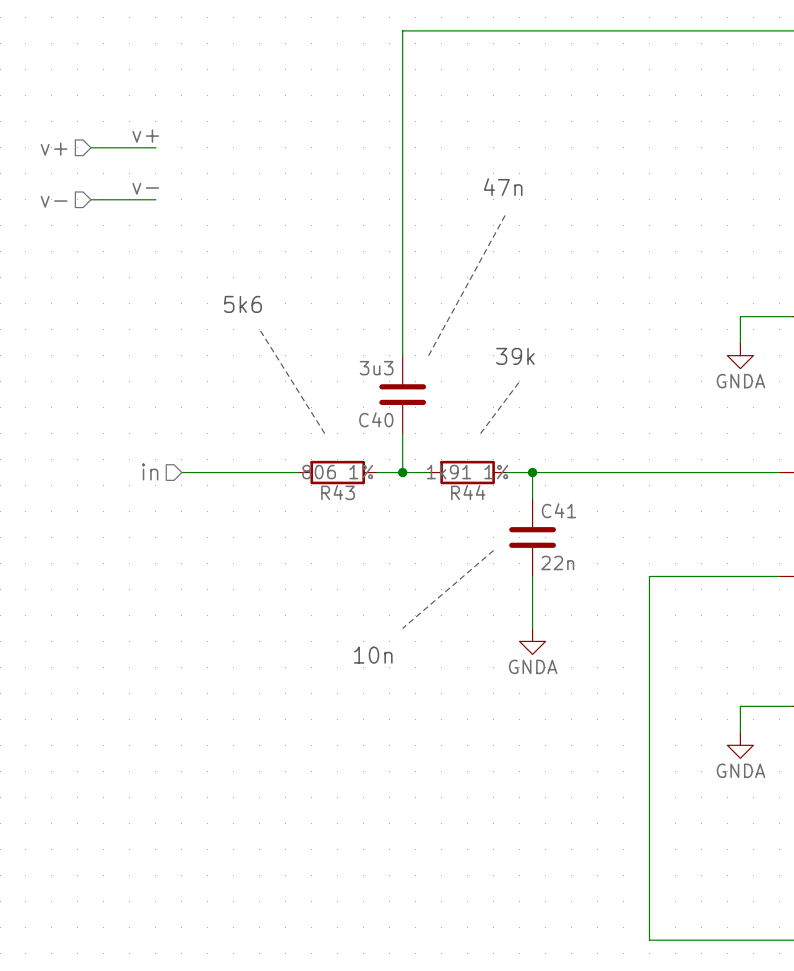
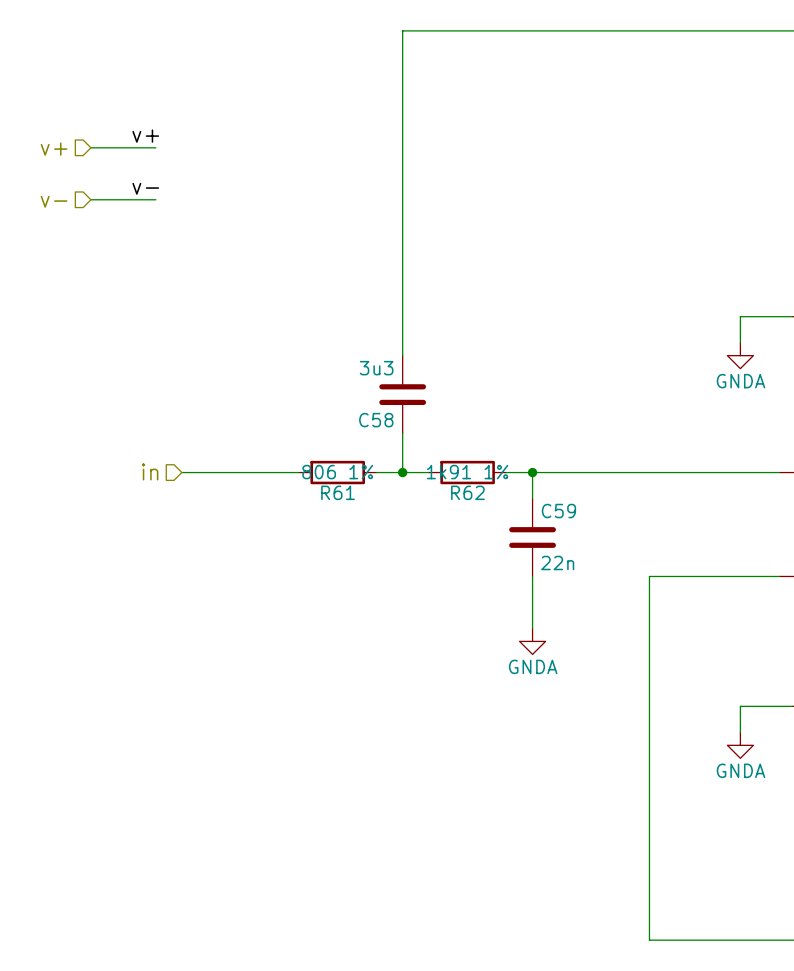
text: 47n (503, 187) -> none
line: (506, 212) (428, 355) -> none
text: 5k6 (243, 304) -> none
line: (259, 329) (324, 433) -> none
text: 39k (515, 356) -> none
line: (519, 381) (480, 433) -> none
C40 name: C40 (376, 419) -> C58 (376, 420)
R43 name: R43 (338, 492) -> R61 (338, 492)
R44 name: R44 (468, 492) -> R62 (467, 492)
C41 name: C41 (558, 510) -> C59 (558, 511)
line: (493, 550) (402, 628) -> none
text: 10n (373, 655) -> none

